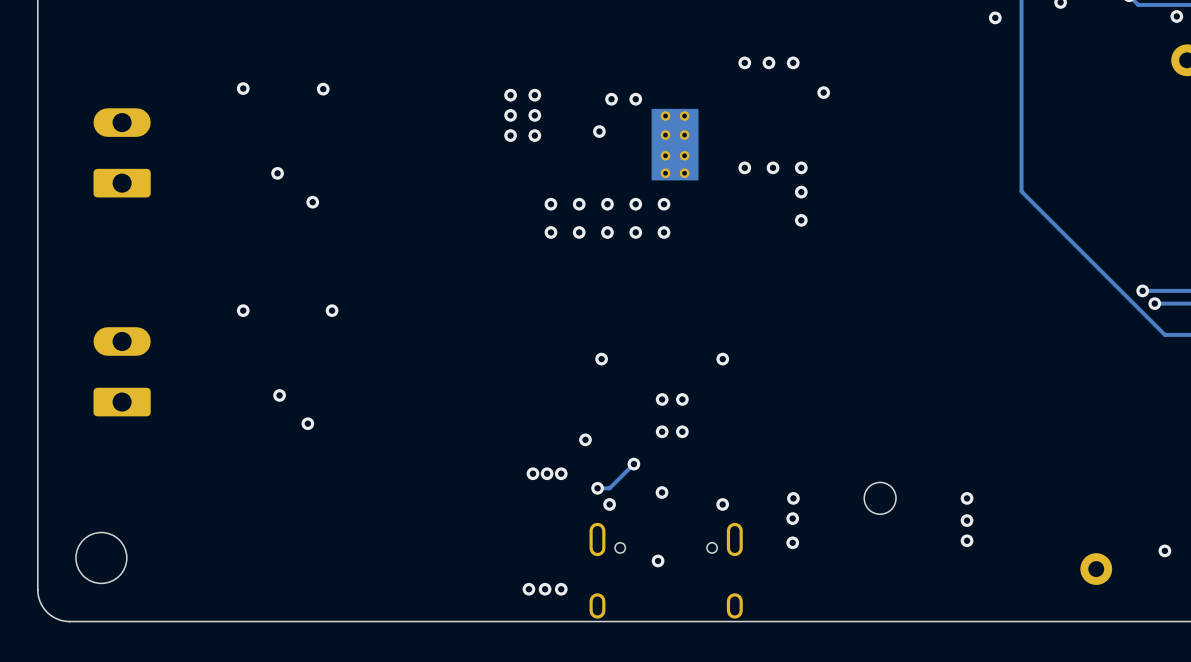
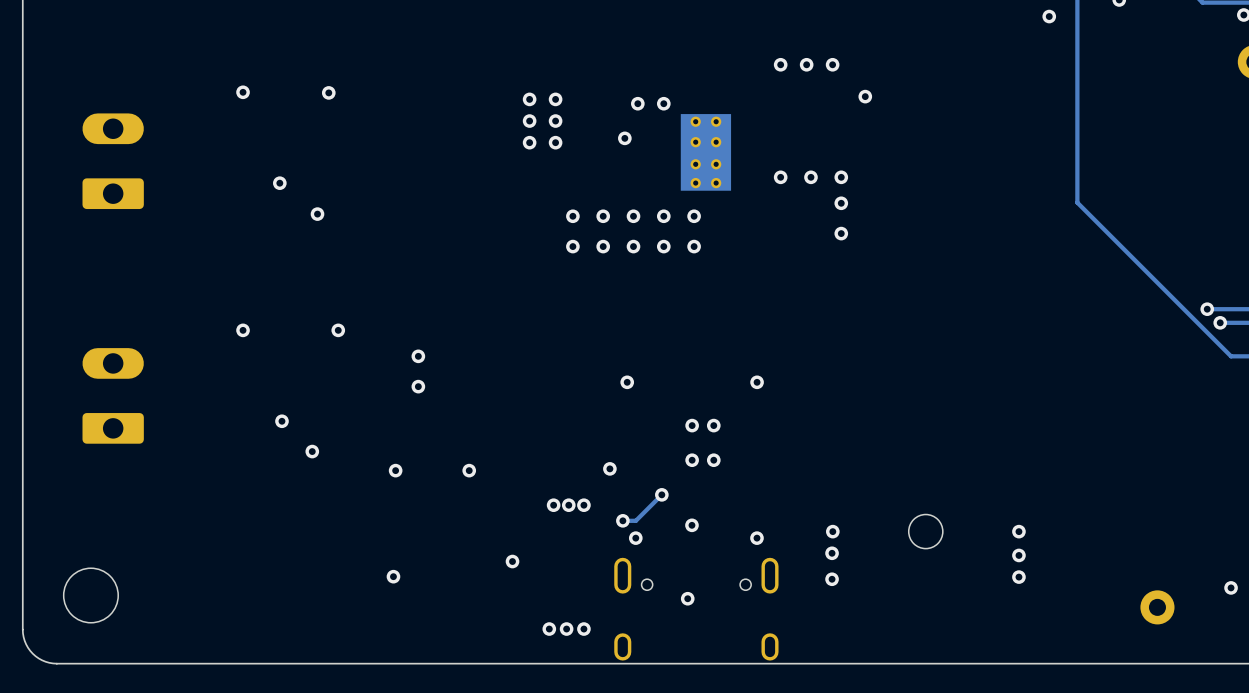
via: none -> (418, 356)
via: none -> (418, 386)
via: none -> (395, 470)
via: none -> (469, 470)
via: none -> (512, 561)
via: none -> (393, 576)

